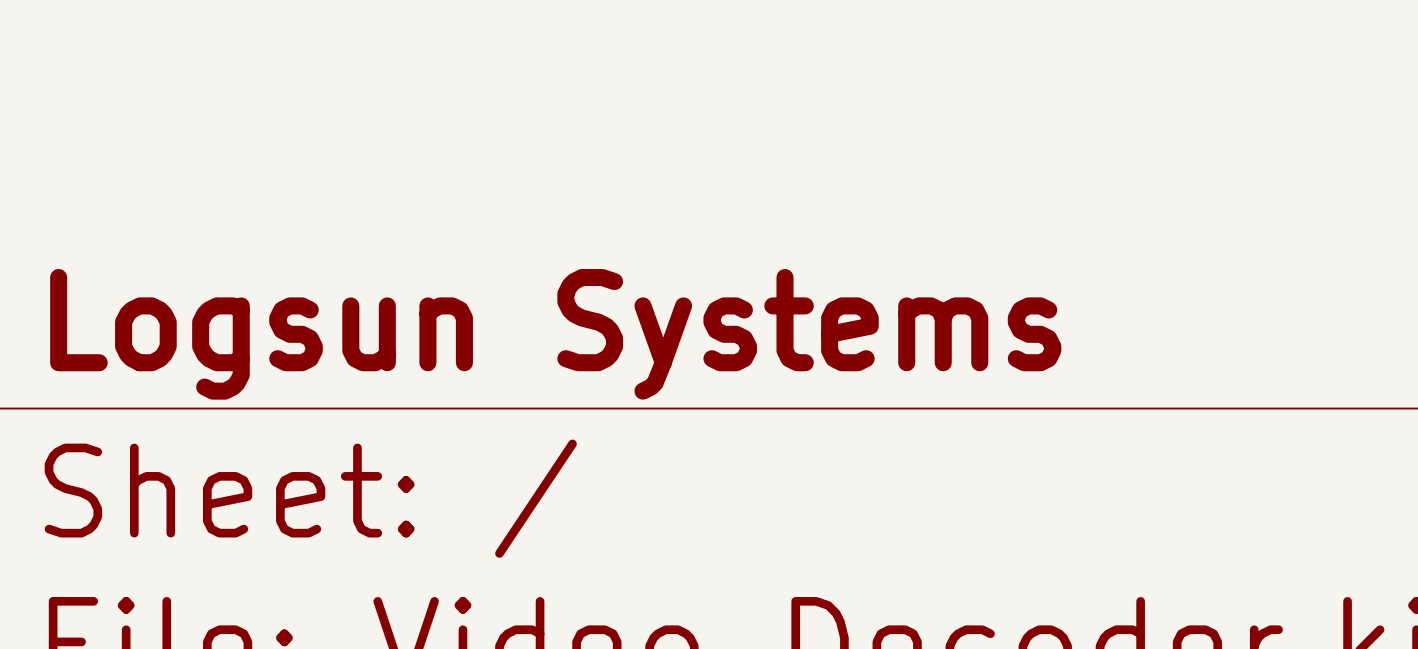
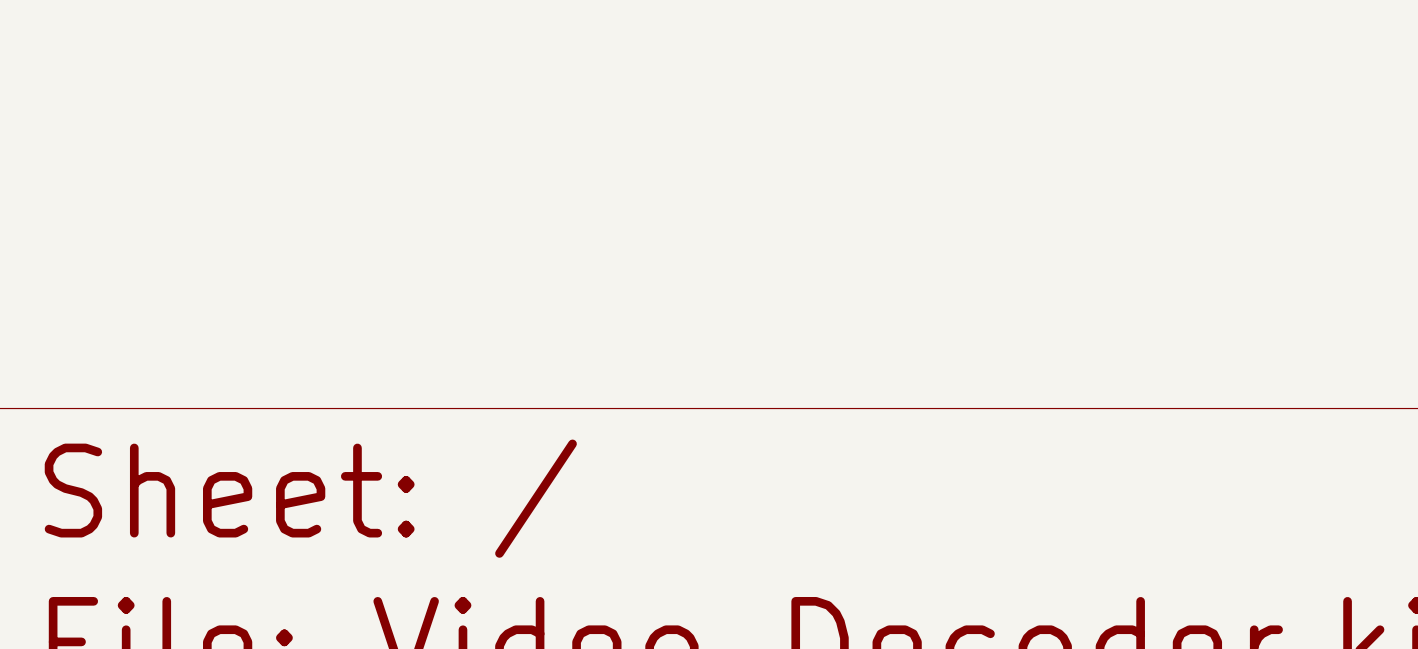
title block: Logsun Systems (555, 334) -> none

